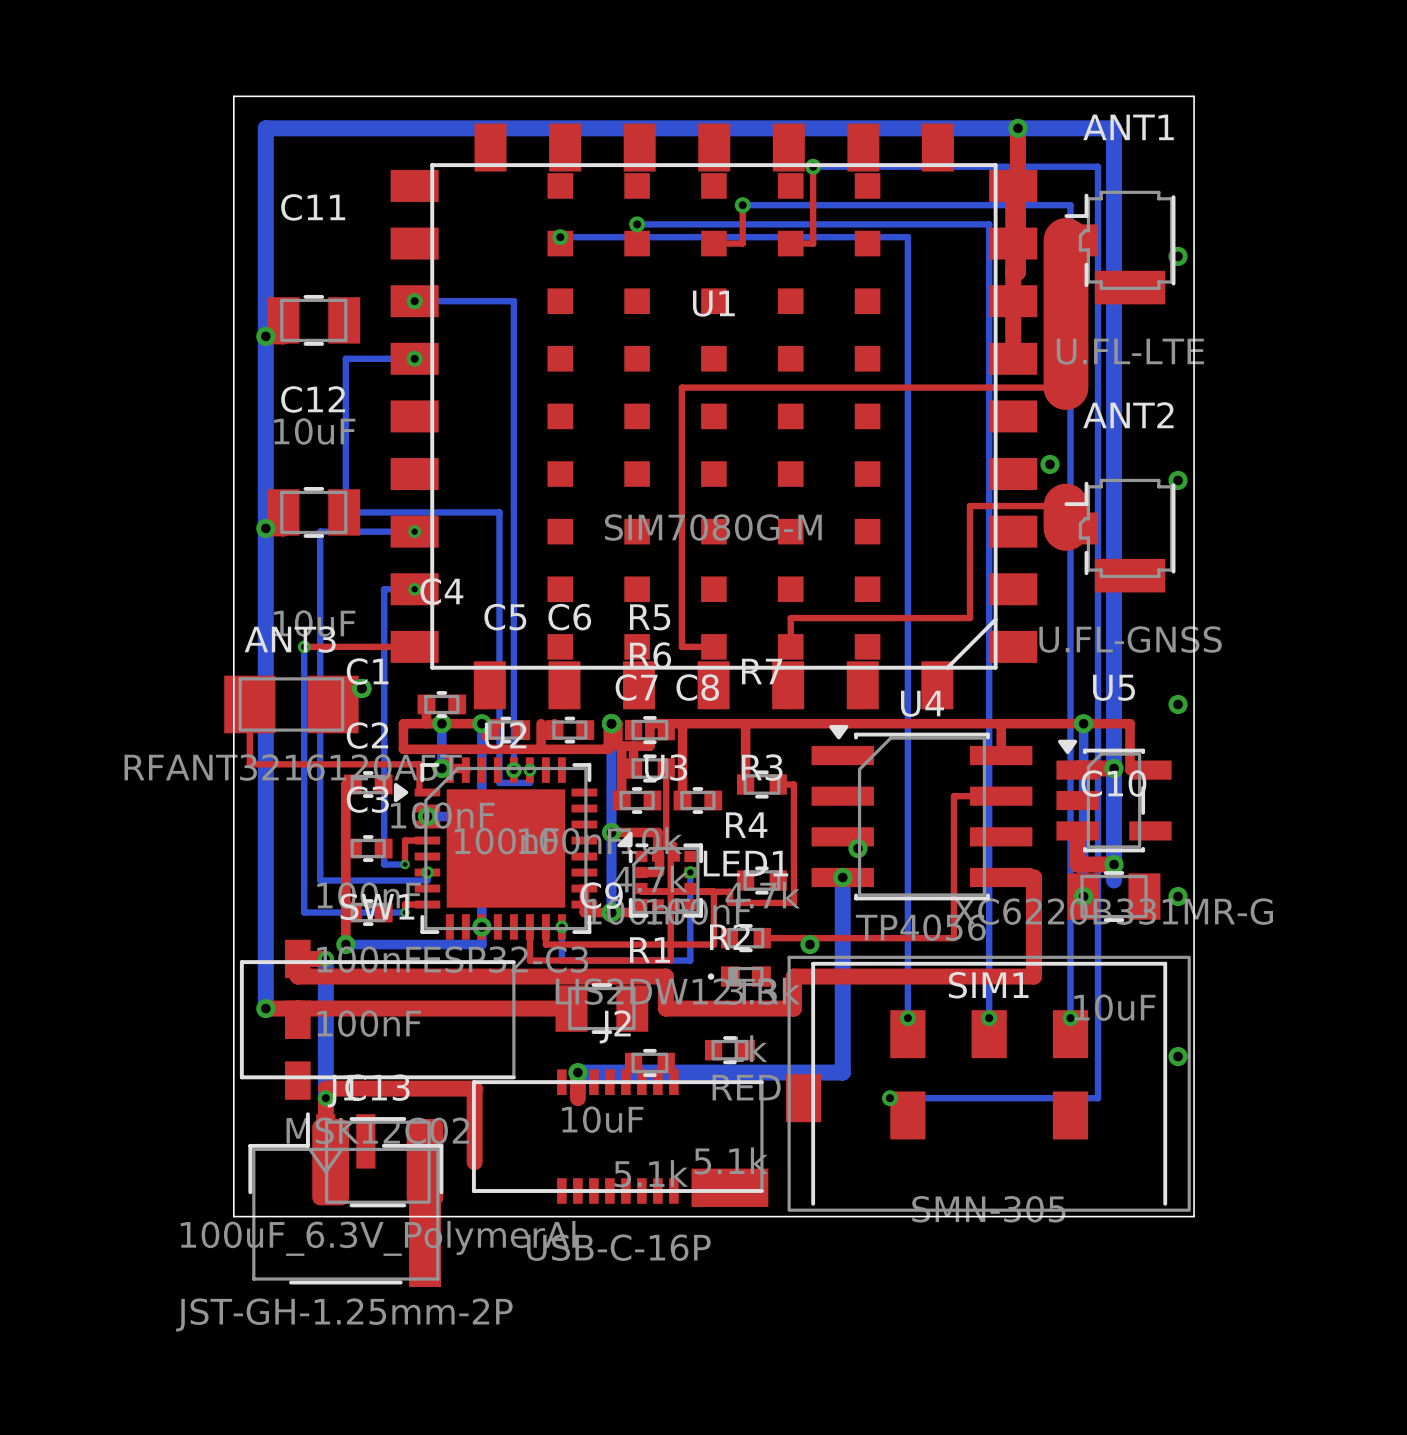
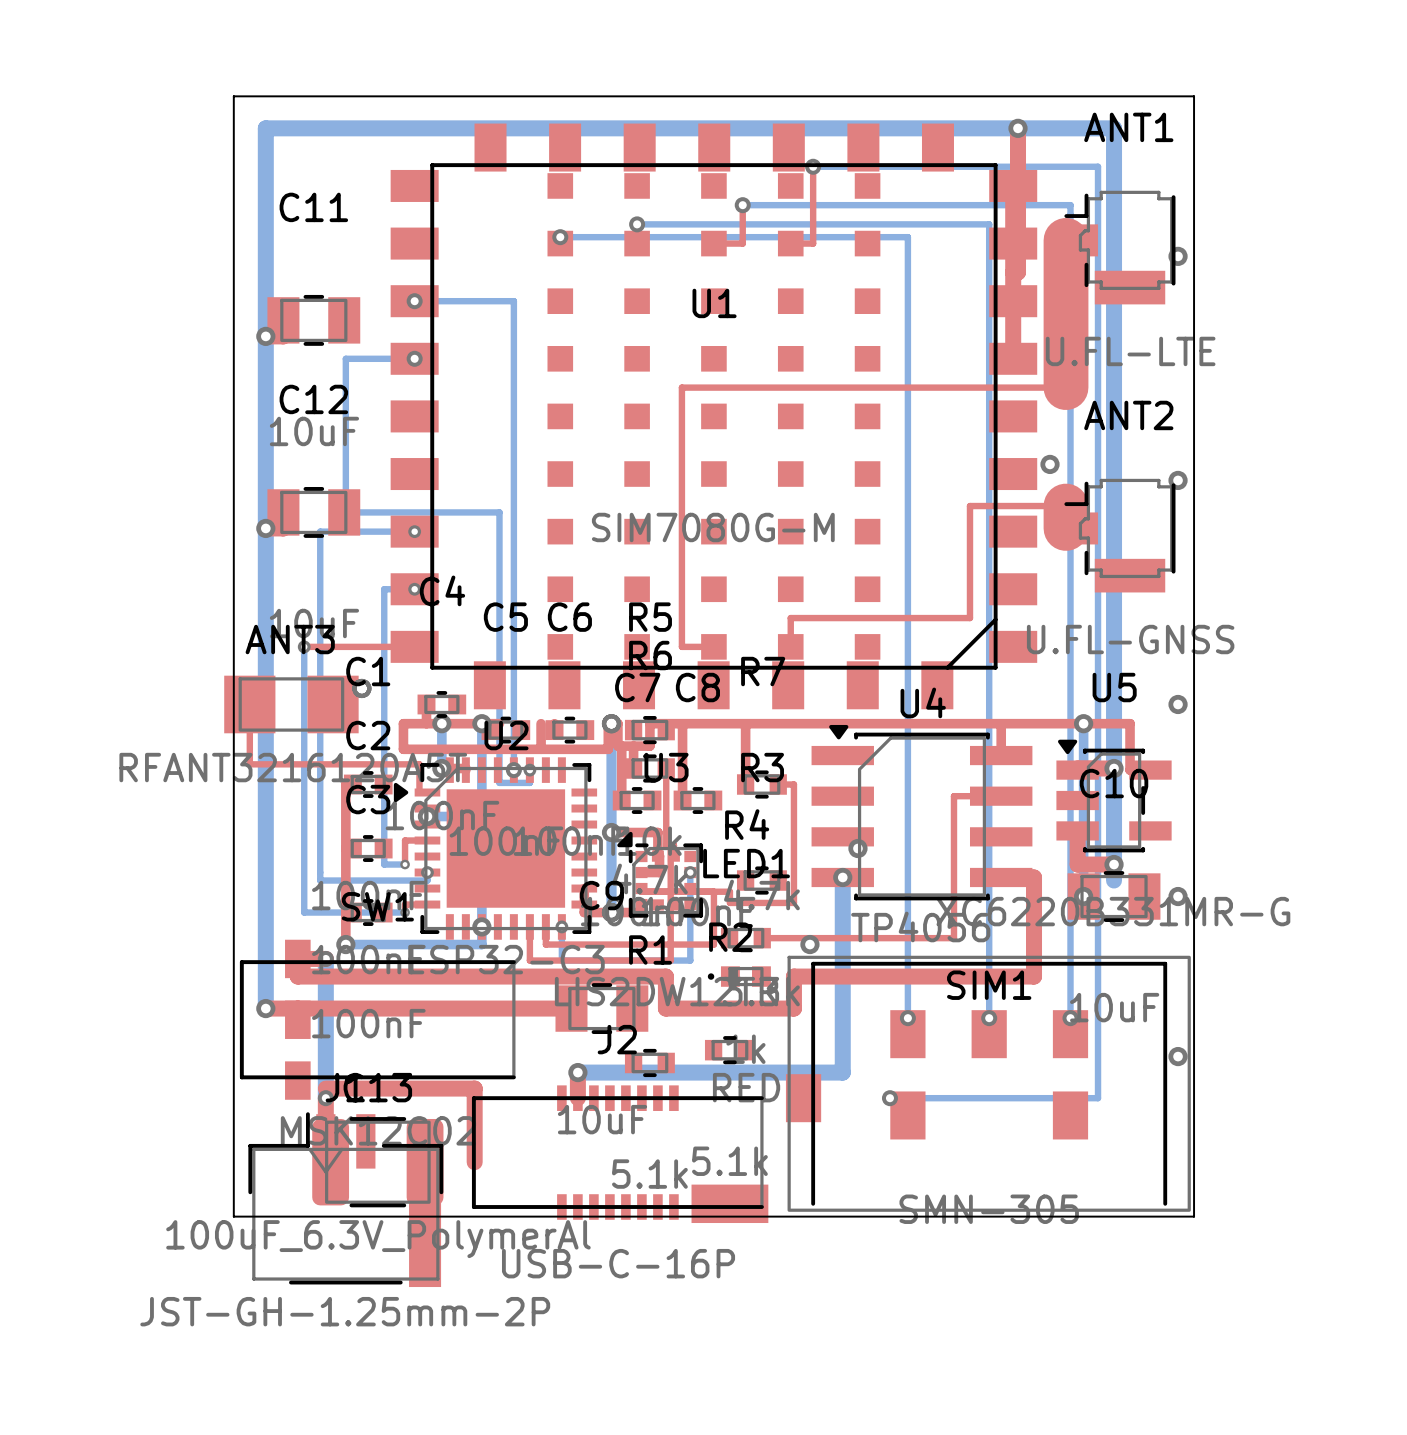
J2 position: (620, 1138) -> (620, 1154)

